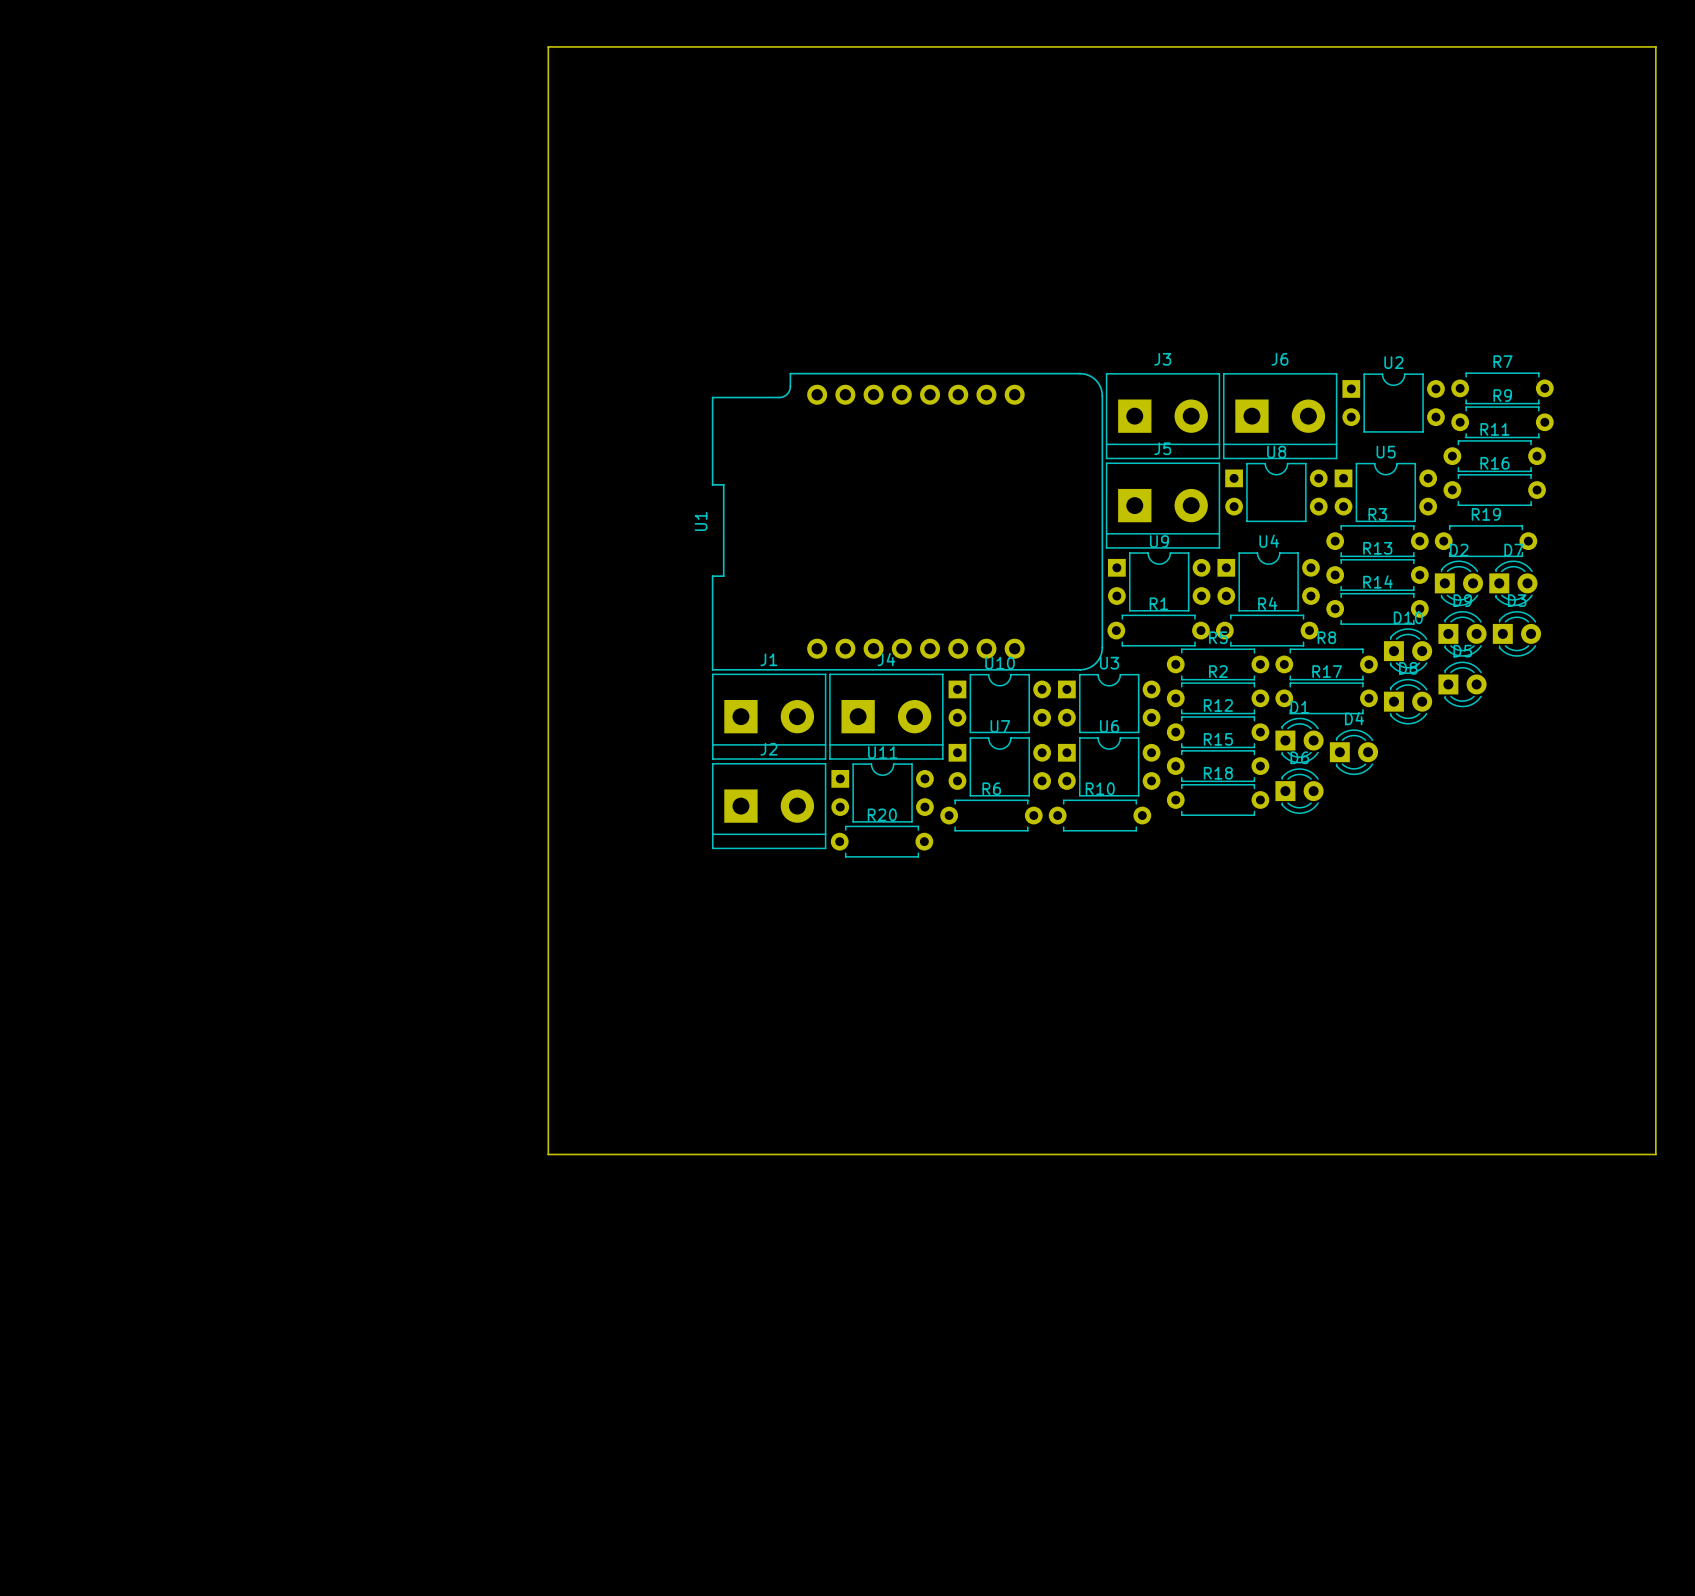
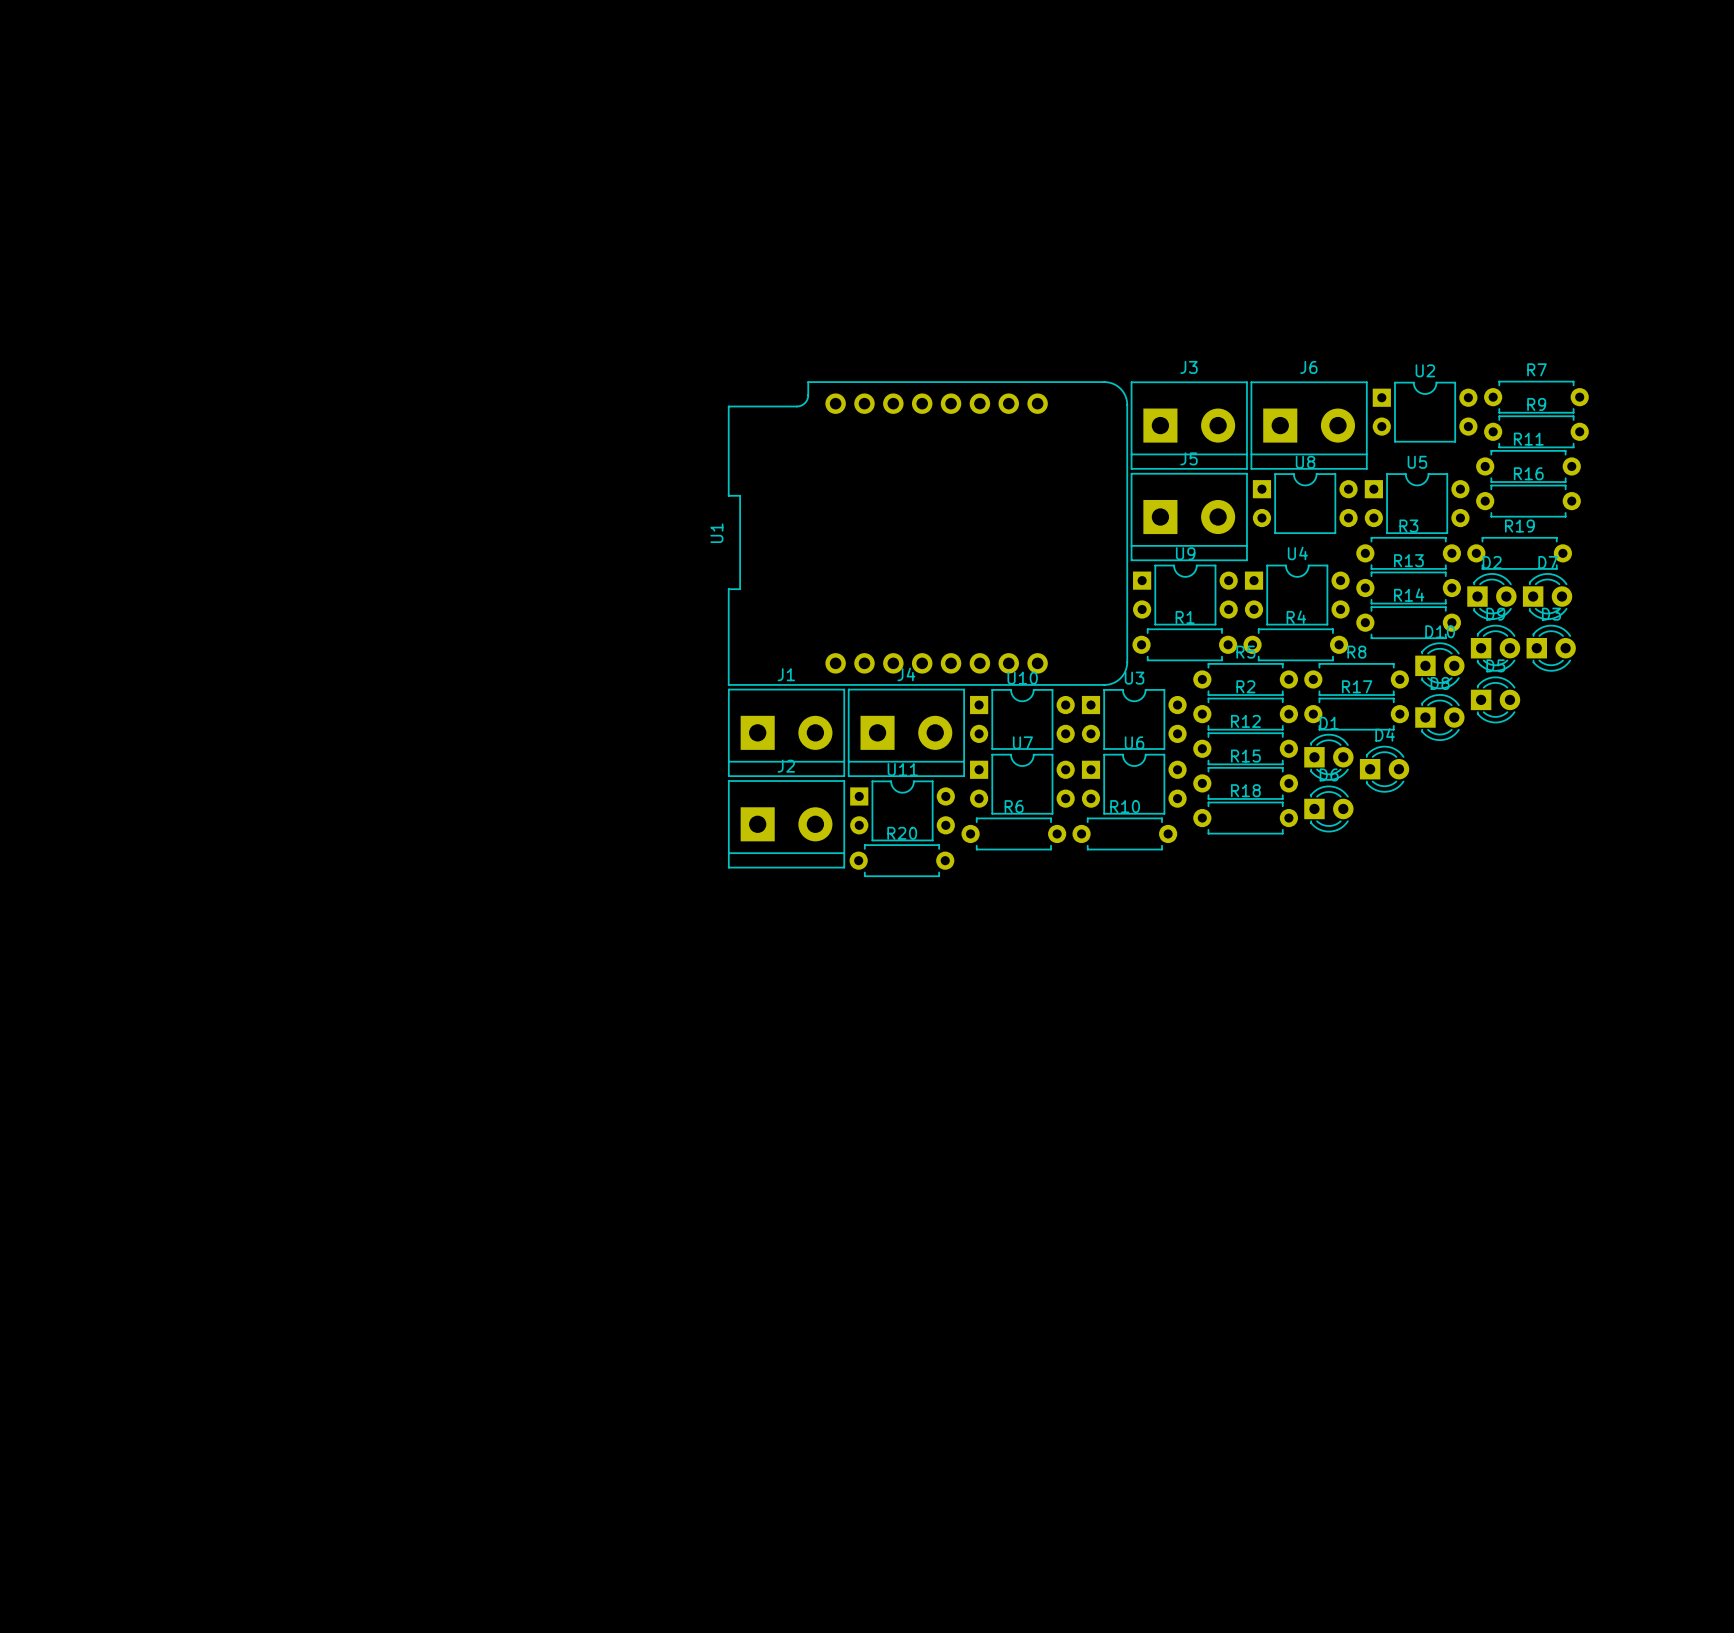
board edge: (548, 46) (548, 1154) (1655, 1154) (1655, 46) (548, 46) -> none

